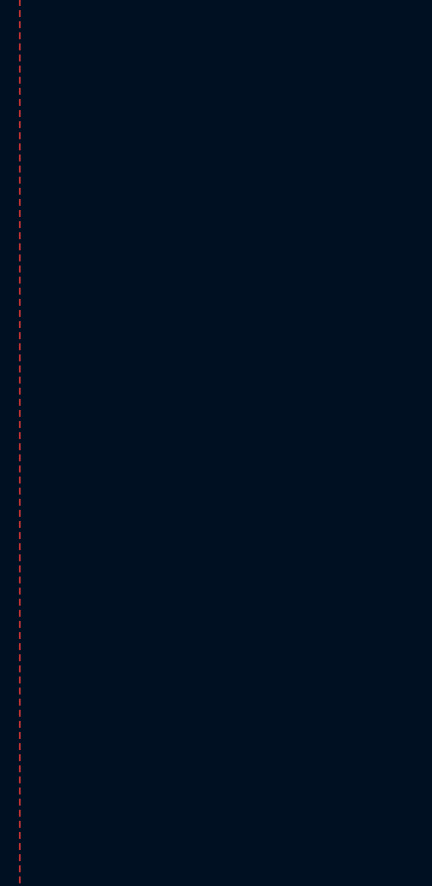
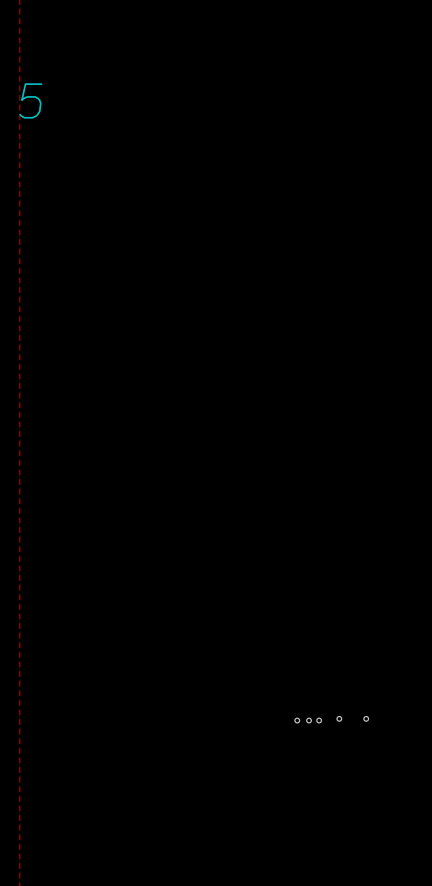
via: none -> (339, 718)
via: none -> (366, 718)
via: none -> (297, 720)
via: none -> (309, 720)
via: none -> (319, 720)

